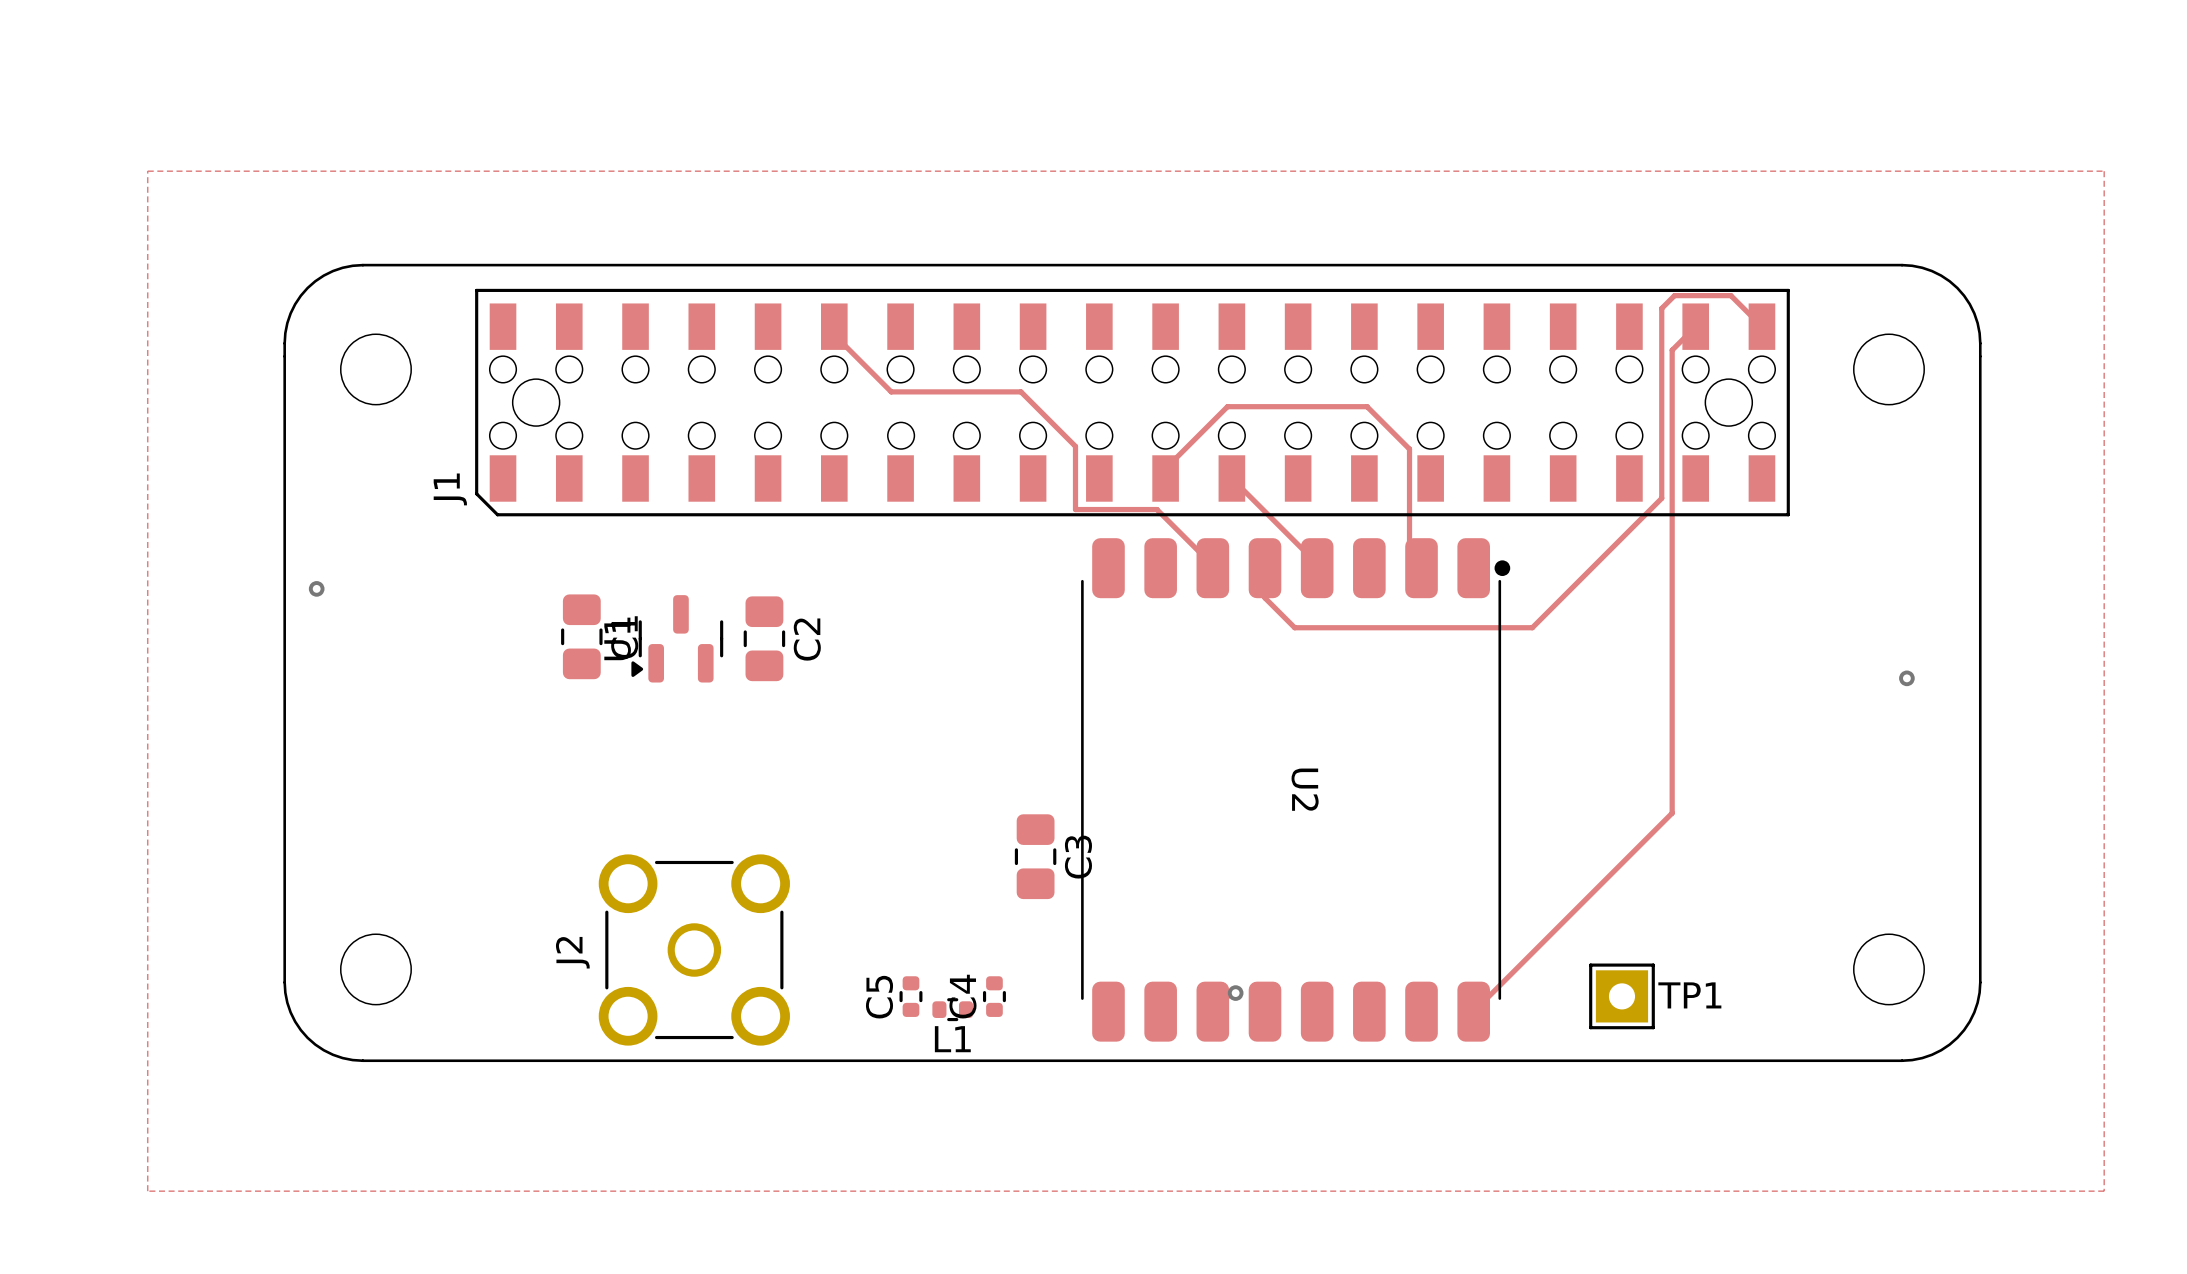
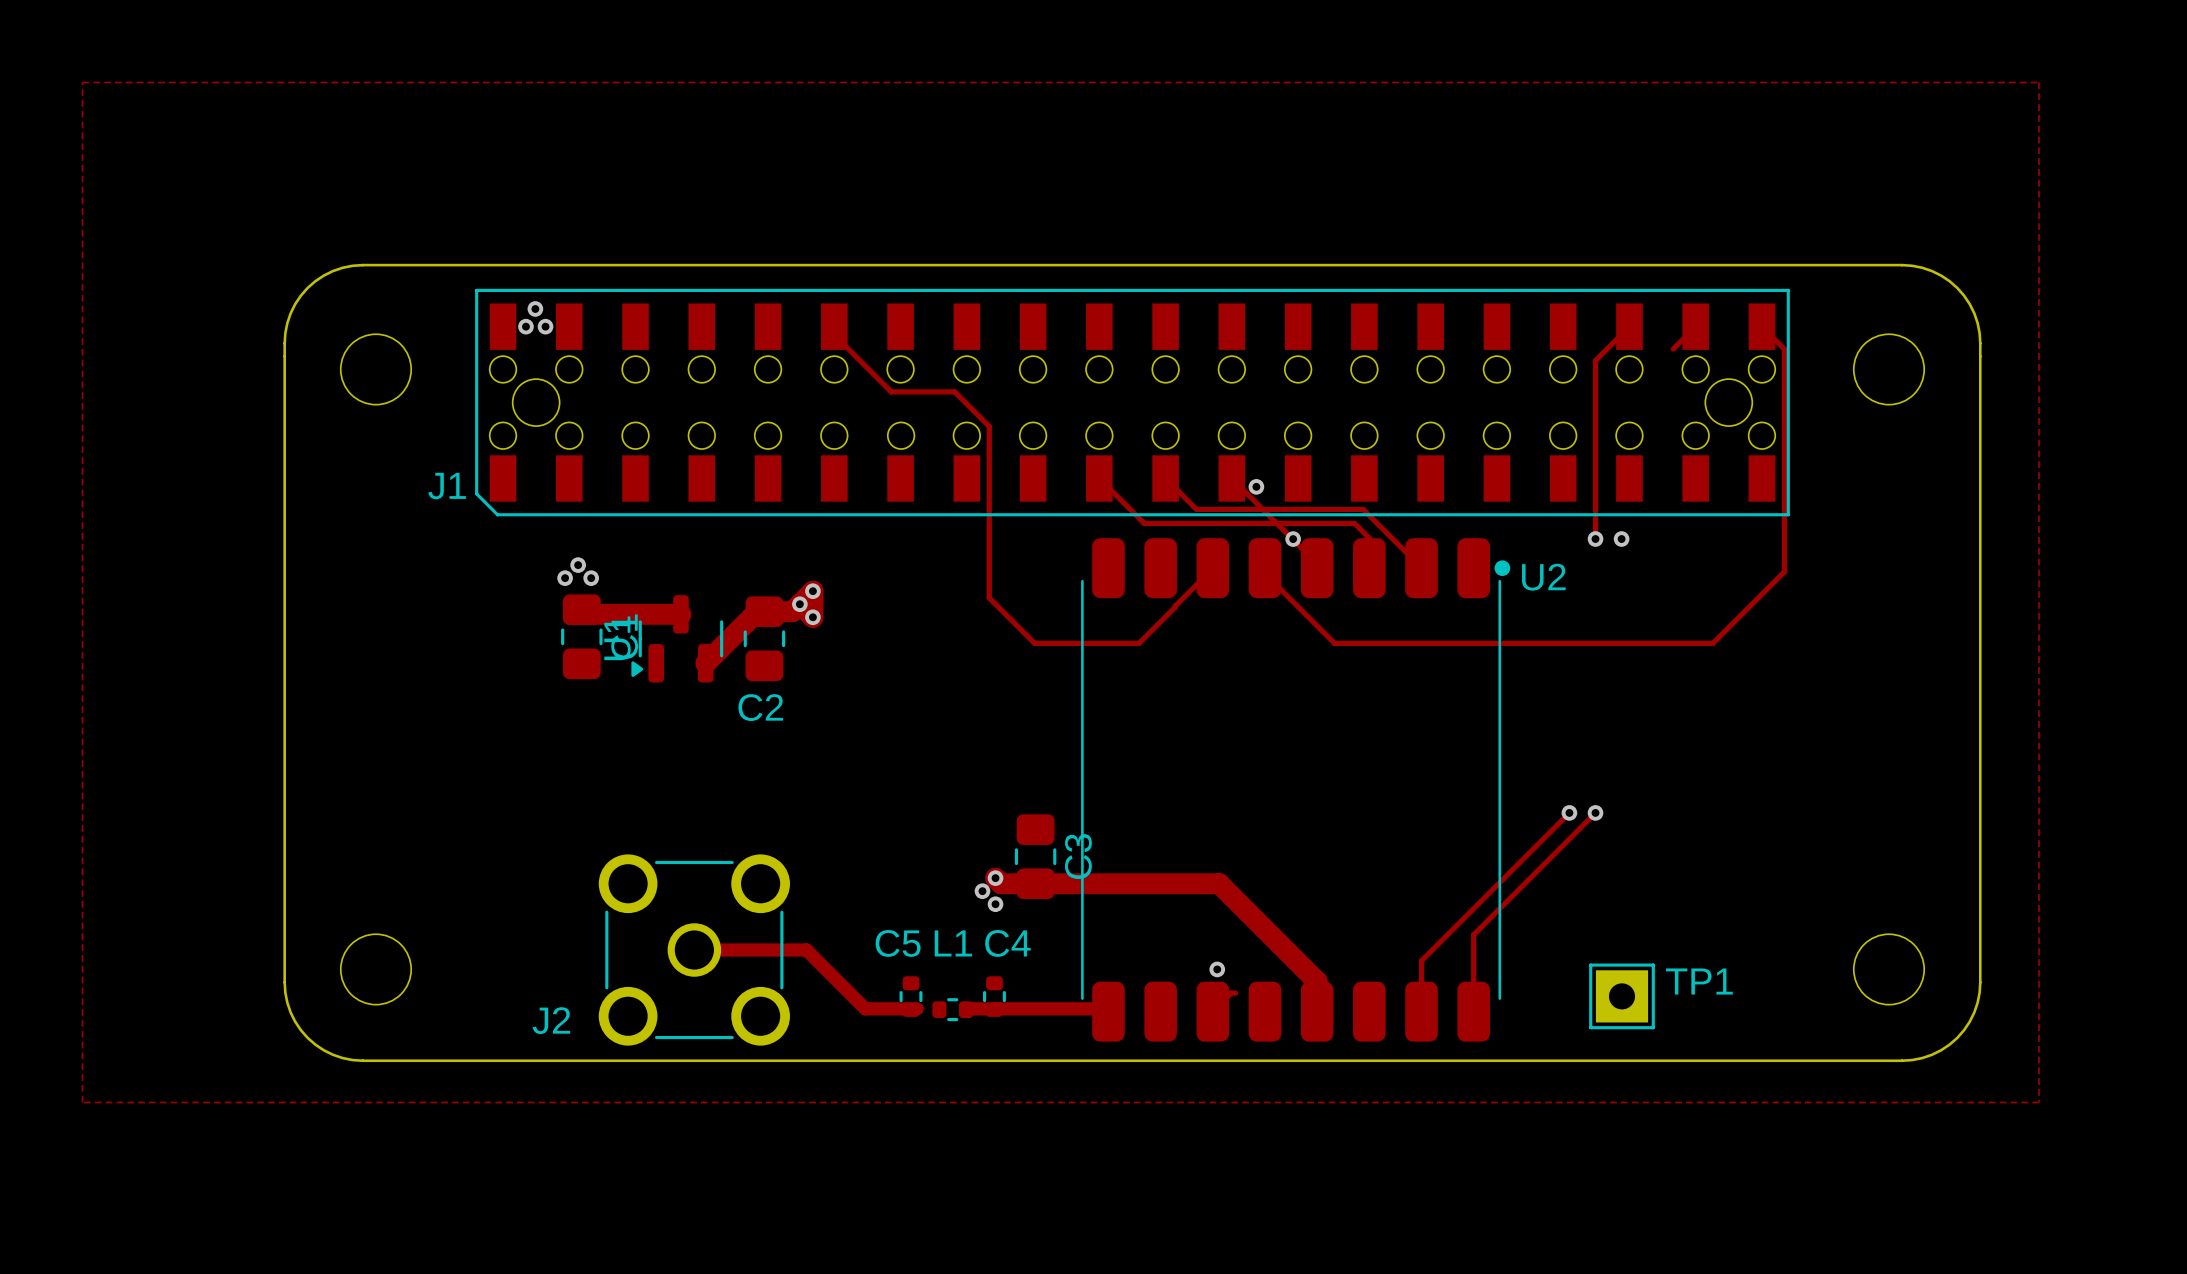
zone outline: (147, 171) (2104, 171) (2104, 1191) (147, 1191) (147, 171) -> (82, 82) (2038, 82) (2038, 1102) (82, 1102) (82, 82)
via: none -> (535, 308)
via: none -> (525, 326)
via: none -> (545, 326)
track: none -> (1629, 326) (1595, 360) (1595, 539)
track: (1761, 326) (1730, 295) (1674, 295) (1661, 308) (1661, 498) (1532, 627) (1294, 627) (1265, 598) (1265, 568) -> (1761, 326) (1784, 349) (1784, 571) (1712, 643) (1334, 643) (1265, 573)
track: (1673, 349) (1672, 813) (1473, 1011) -> (1595, 812) (1473, 934) (1473, 1011)
track: (954, 391) (1020, 391) (1075, 446) (1075, 509) (1156, 509) (1212, 565) (1212, 568) -> (954, 391) (989, 426) (989, 597) (1034, 643) (1139, 643) (1212, 568)
track: none -> (1099, 478) (1144, 523) (1354, 523) (1369, 538) (1369, 568)
track: (1165, 478) (1165, 468) (1227, 406) (1367, 406) (1409, 449) (1409, 556) (1421, 568) -> (1165, 478) (1196, 509) (1363, 509) (1421, 567)
via: none -> (1256, 486)
J1 name rotation: 0° (450, 489) -> 90° clockwise (447, 486)
via: none -> (1293, 539)
via: none -> (1595, 539)
via: none -> (1621, 539)
via: none -> (578, 565)
via: none -> (565, 578)
via: none -> (591, 578)
via: (316, 588) -> none
via: none -> (812, 591)
track: none -> (799, 604) (812, 617) (812, 591) (792, 611) (764, 611)
via: none -> (799, 604)
track: none -> (757, 611) (705, 663)
track: none -> (586, 614) (680, 614)
via: none -> (812, 617)
C2 name rotation: 0° (807, 639) -> 90° clockwise (760, 707)
C2 name position: C2 (807, 639) -> C2 (760, 707)
via: (1906, 678) -> none
U2 name rotation: 0° (1305, 789) -> 90° counterclockwise (1543, 577)
U2 name position: U2 (1305, 789) -> U2 (1543, 577)
track: none -> (1569, 812) (1421, 960) (1421, 1011)
via: none -> (1569, 812)
via: none -> (1595, 812)
track: none -> (995, 878) (1001, 883) (1219, 883) (1317, 981) (1317, 1011)
via: none -> (995, 878)
via: none -> (982, 891)
via: none -> (995, 904)
track: none -> (694, 950) (806, 950) (865, 1008) (917, 1008)
J2 name rotation: 0° (572, 952) -> 90° clockwise (551, 1020)
J2 name position: J2 (572, 952) -> J2 (551, 1020)
via position: (1235, 993) -> (1217, 969)
TP1 name position: TP1 (1689, 995) -> TP1 (1699, 981)
C4 name rotation: 0° (962, 996) -> 90° clockwise (1007, 943)
C4 name position: C4 (962, 996) -> C4 (1007, 943)
C5 name rotation: 0° (879, 997) -> 90° clockwise (898, 943)
track: none -> (969, 1008) (1105, 1008)
L1 name position: L1 (952, 1039) -> L1 (953, 943)

